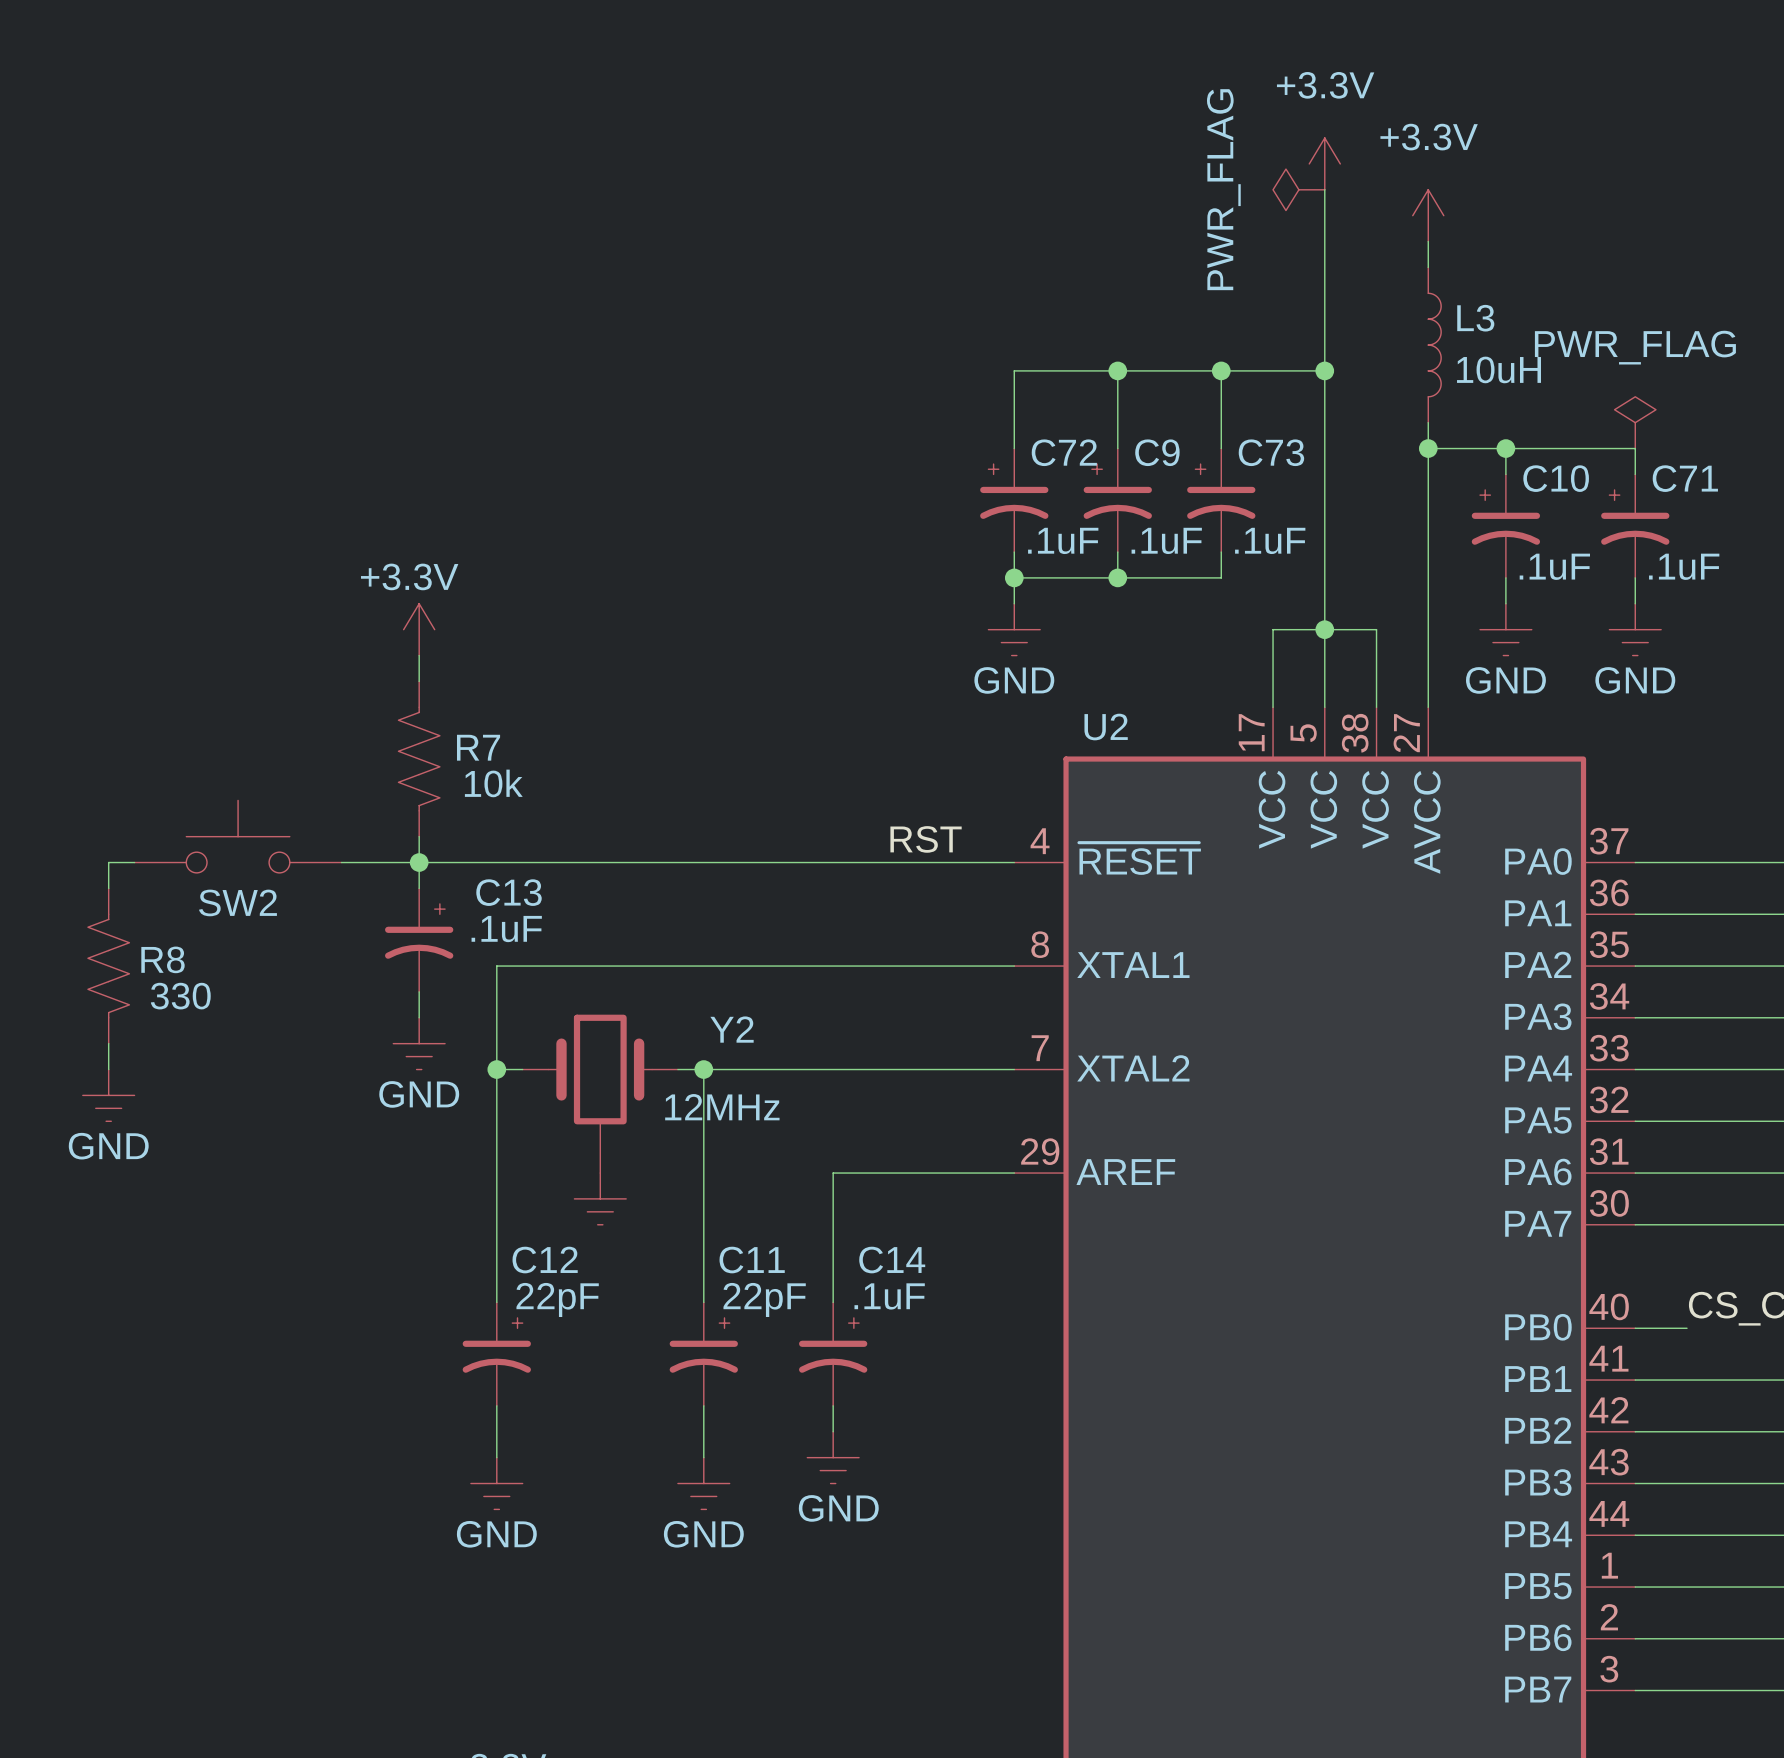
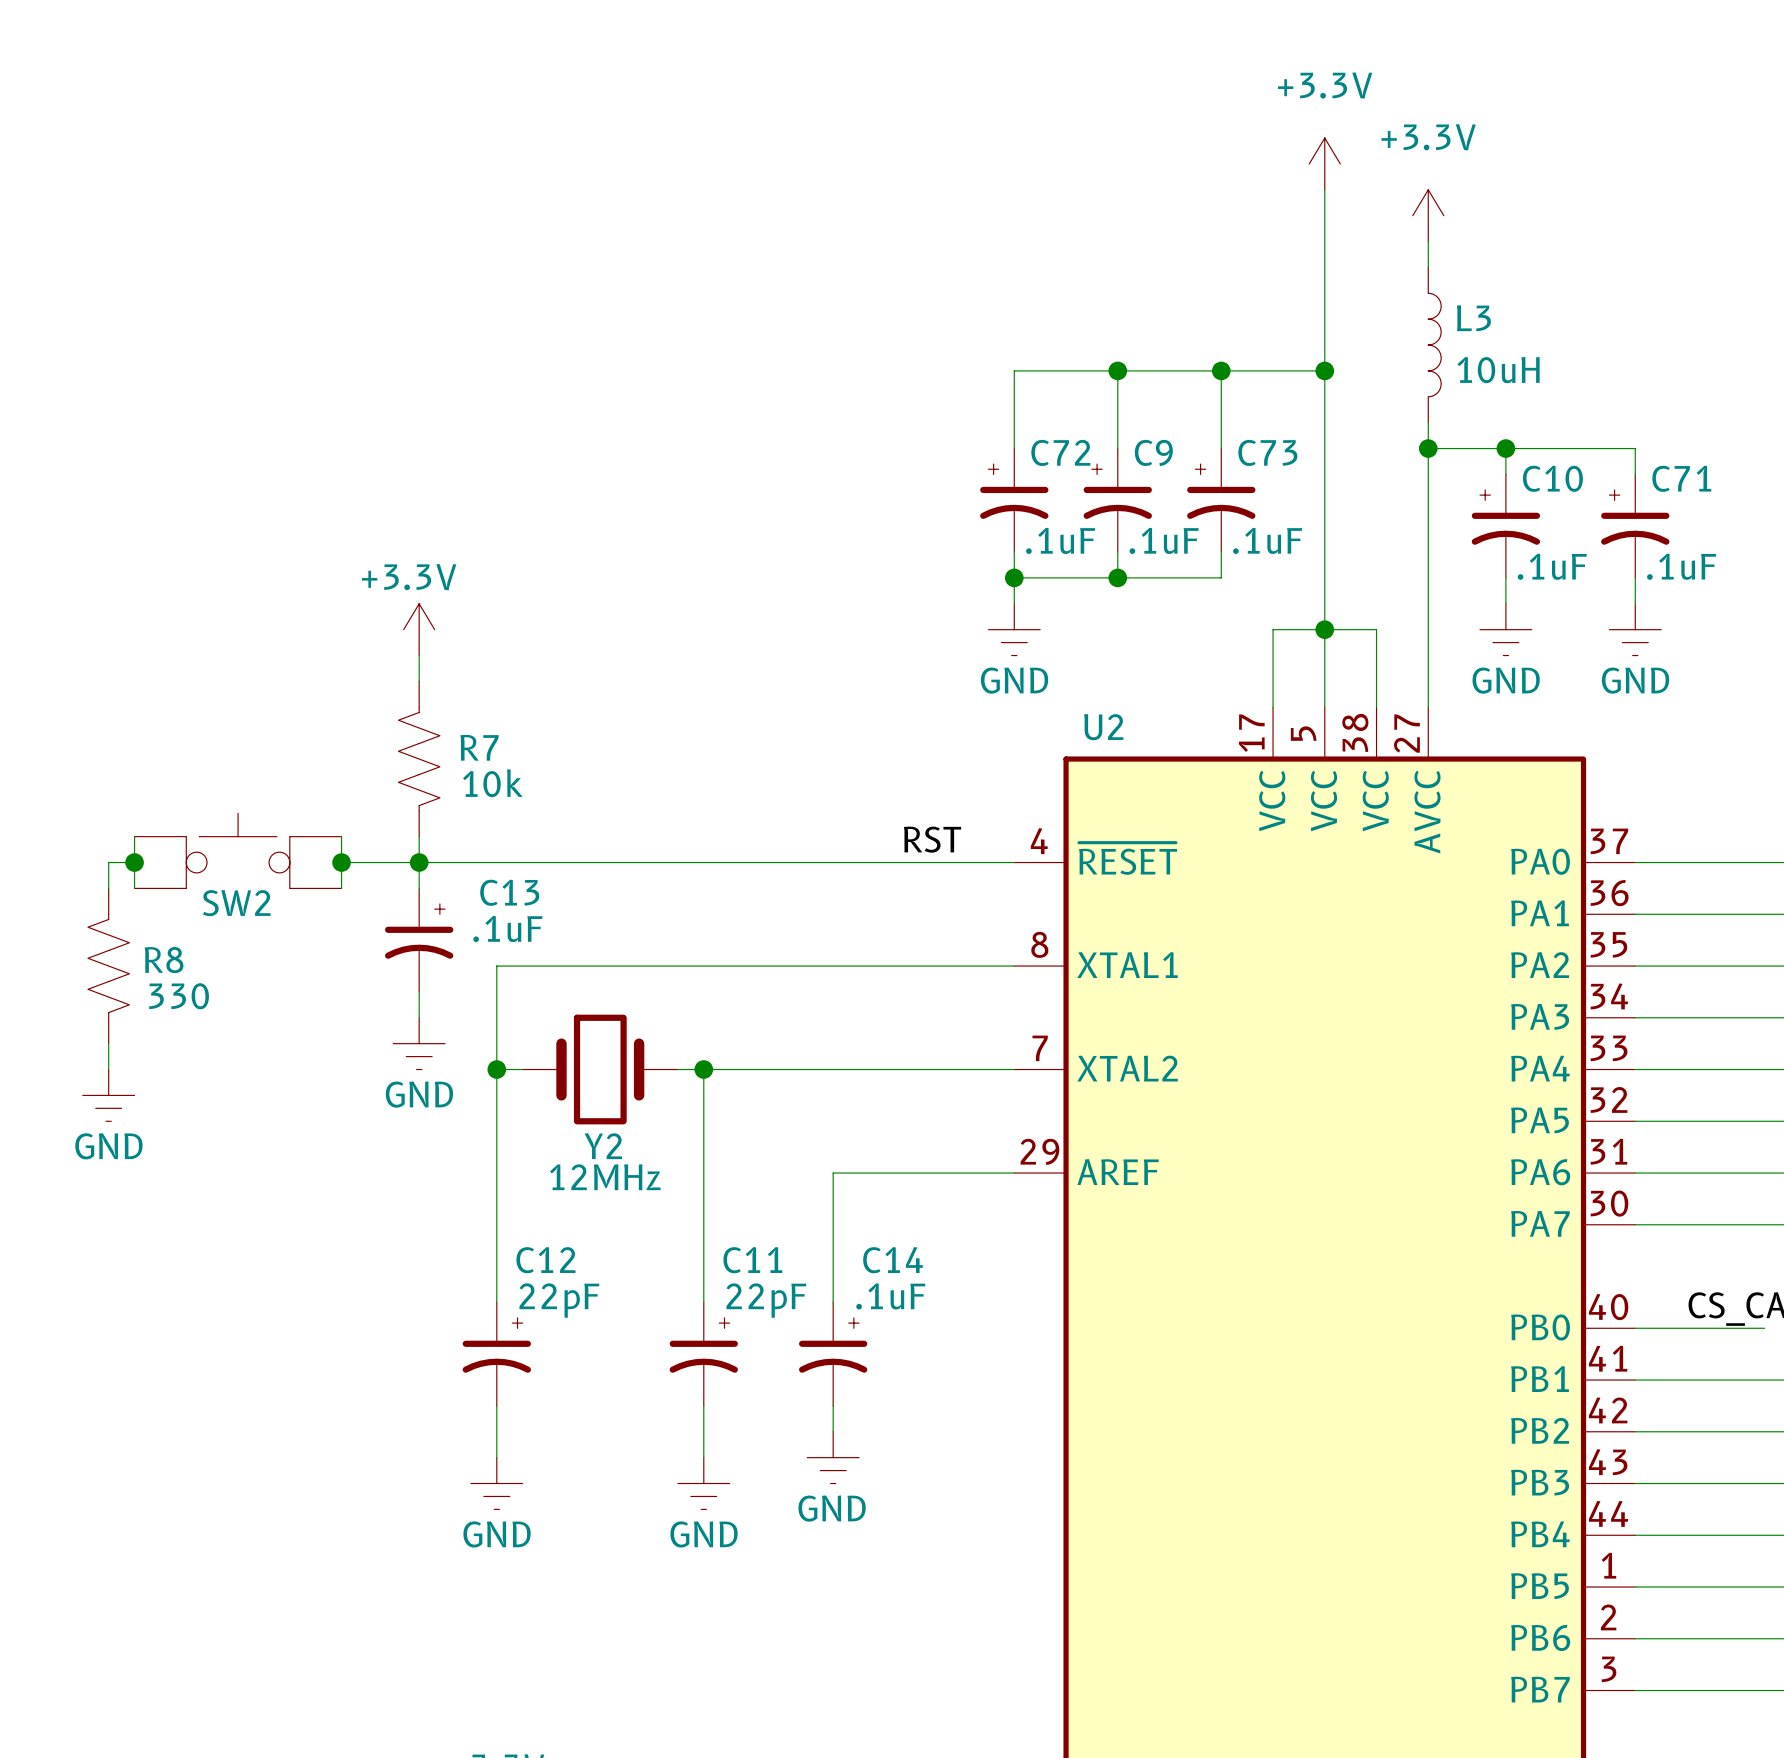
power symbol: PWR_FLAG (1298, 189) -> none
power symbol: PWR_FLAG (1635, 422) -> none
SW2 symbol: [134, 800, 342, 873] -> [134, 813, 342, 889]
wire: none -> (134, 836) (134, 888)
wire: none -> (341, 836) (341, 888)
junction: none -> (134, 862)
junction: none -> (341, 862)
Y2 symbol: [522, 1014, 678, 1174] -> [522, 1014, 678, 1125]
Y2 name position: Y2 (732, 1029) -> Y2 (603, 1146)
Y2 value position: 12MHz (722, 1107) -> 12MHz (605, 1177)
power symbol: (600, 1198) -> none
wire: none -> (1687, 1328) (1764, 1328)

